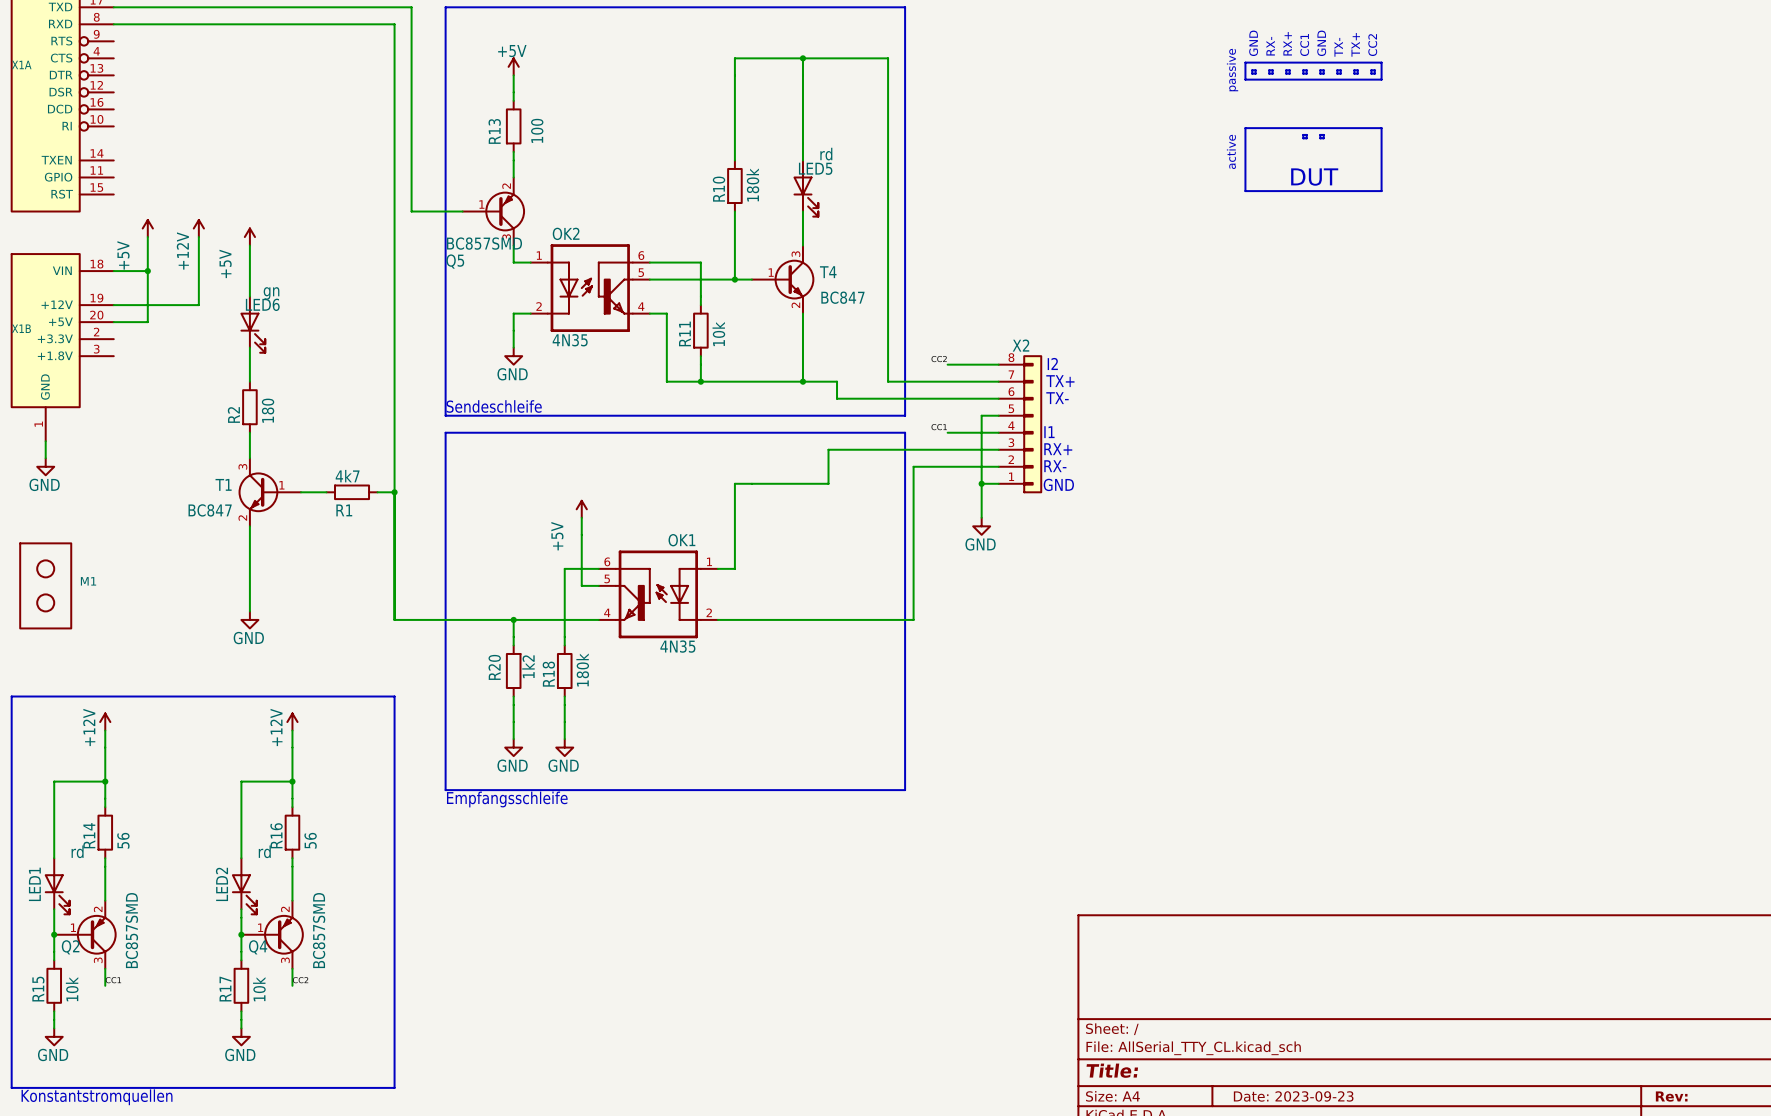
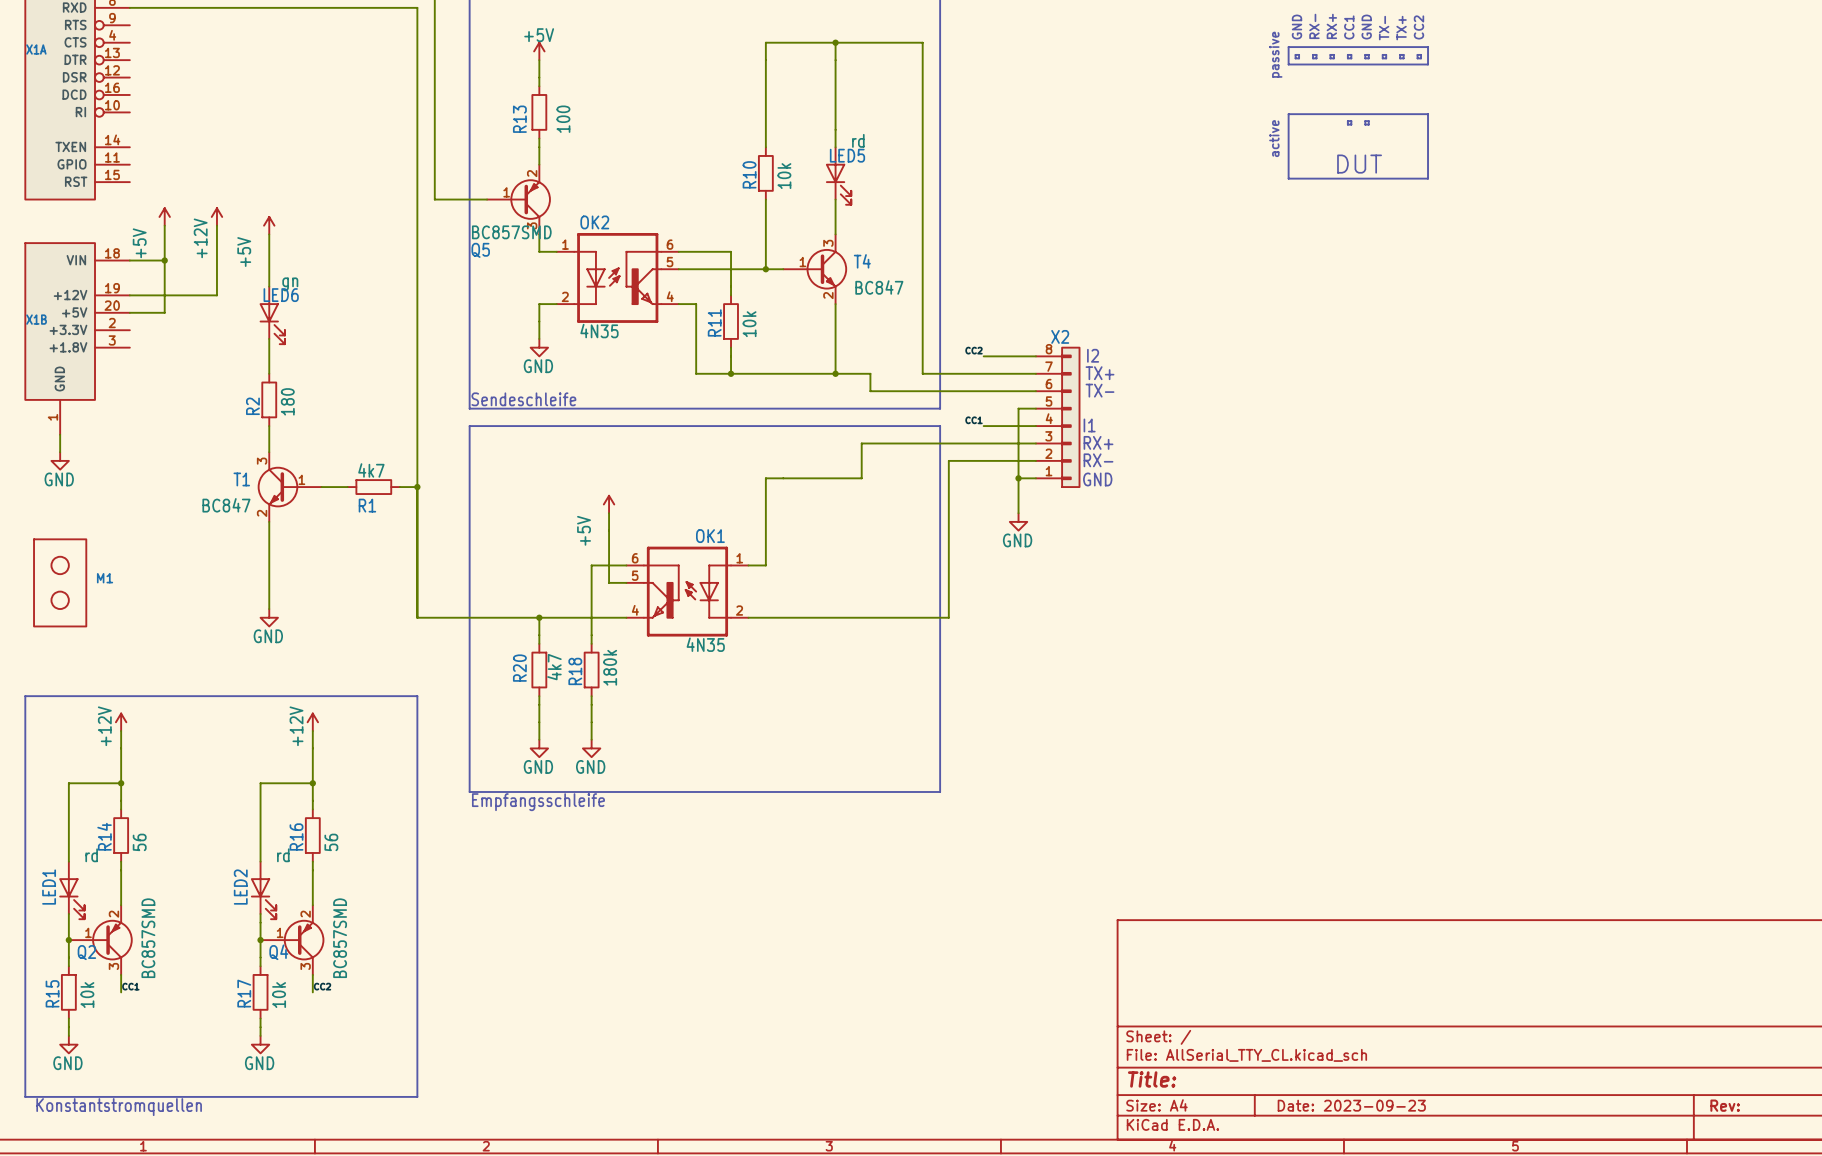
R10 value: 180k (752, 184) -> 10k (784, 176)
R20 value: 1k2 (528, 666) -> 4k7 (554, 667)

